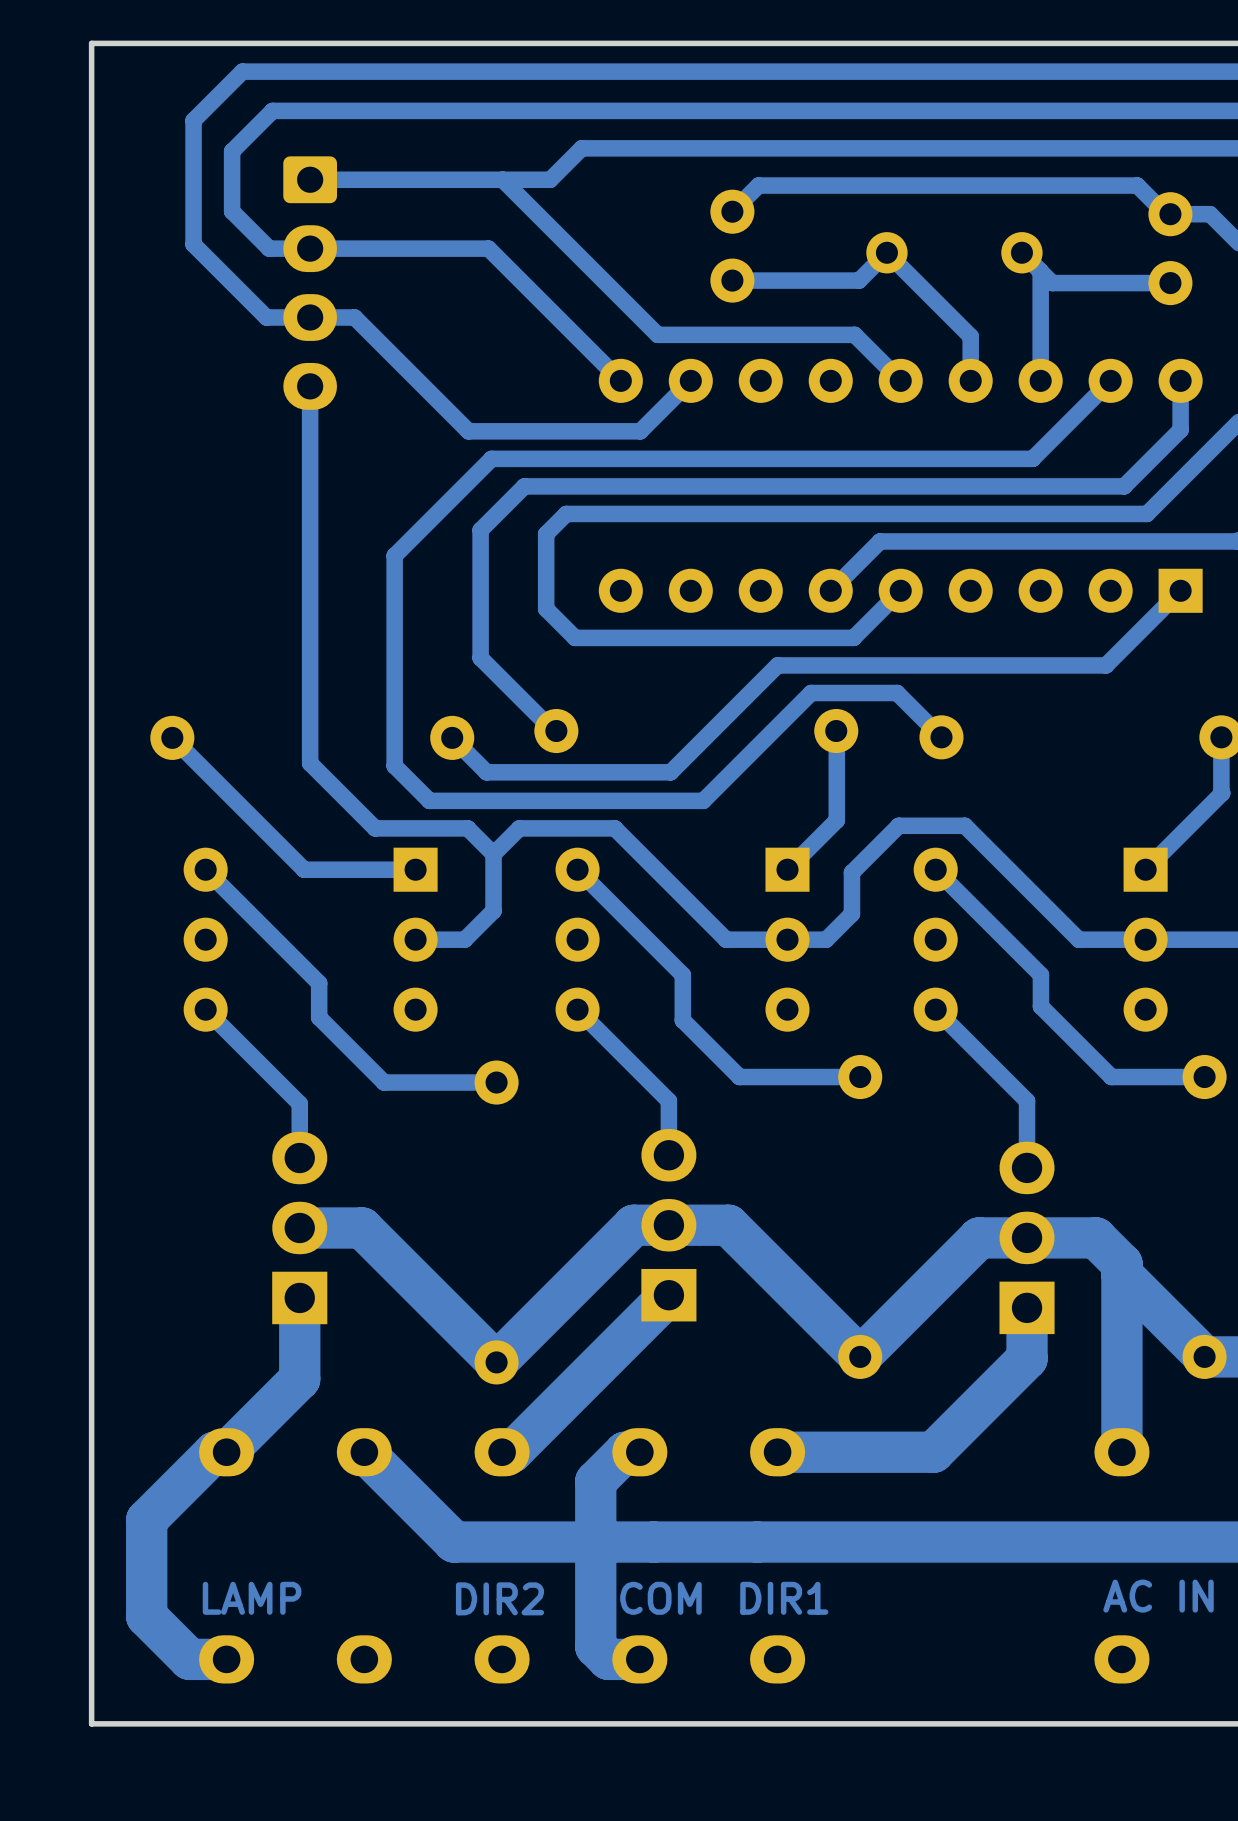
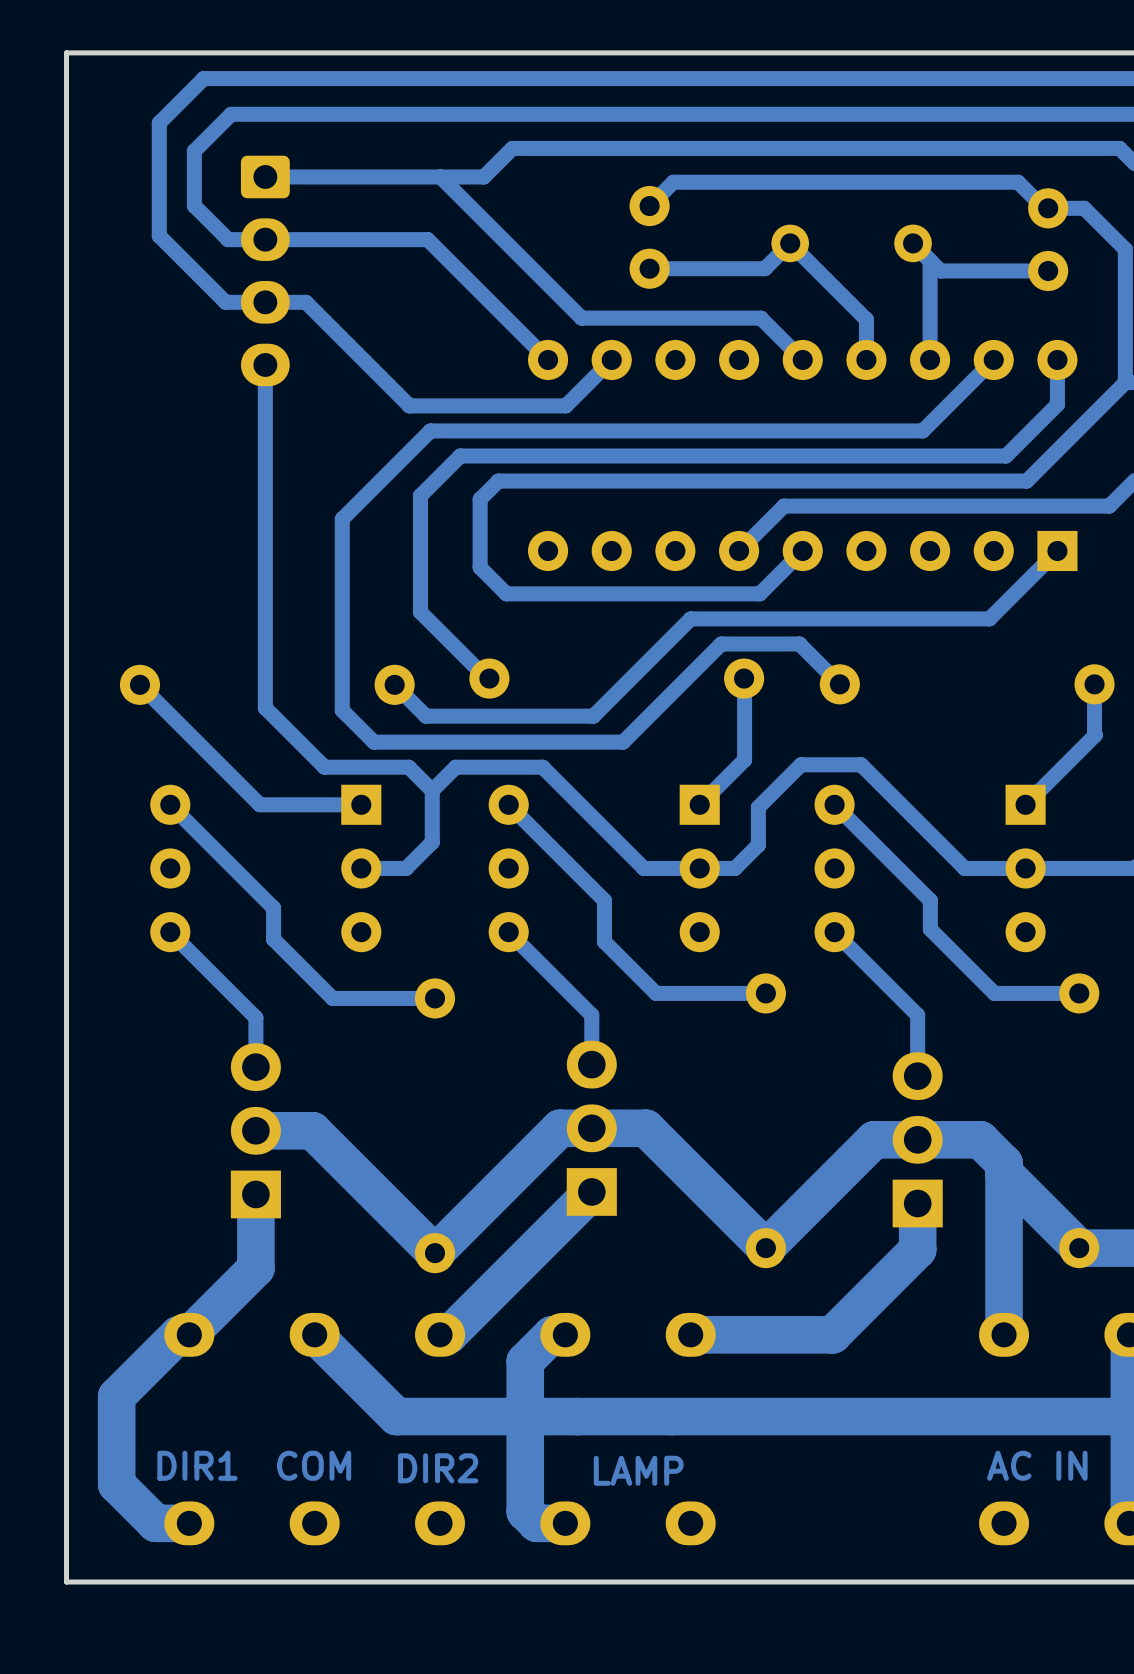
text: LAMP (252, 1598) -> DIR1 (197, 1465)
text position: COM (660, 1598) -> COM (314, 1465)
text: DIR1 (784, 1598) -> none
text: none -> LAMP (638, 1470)

